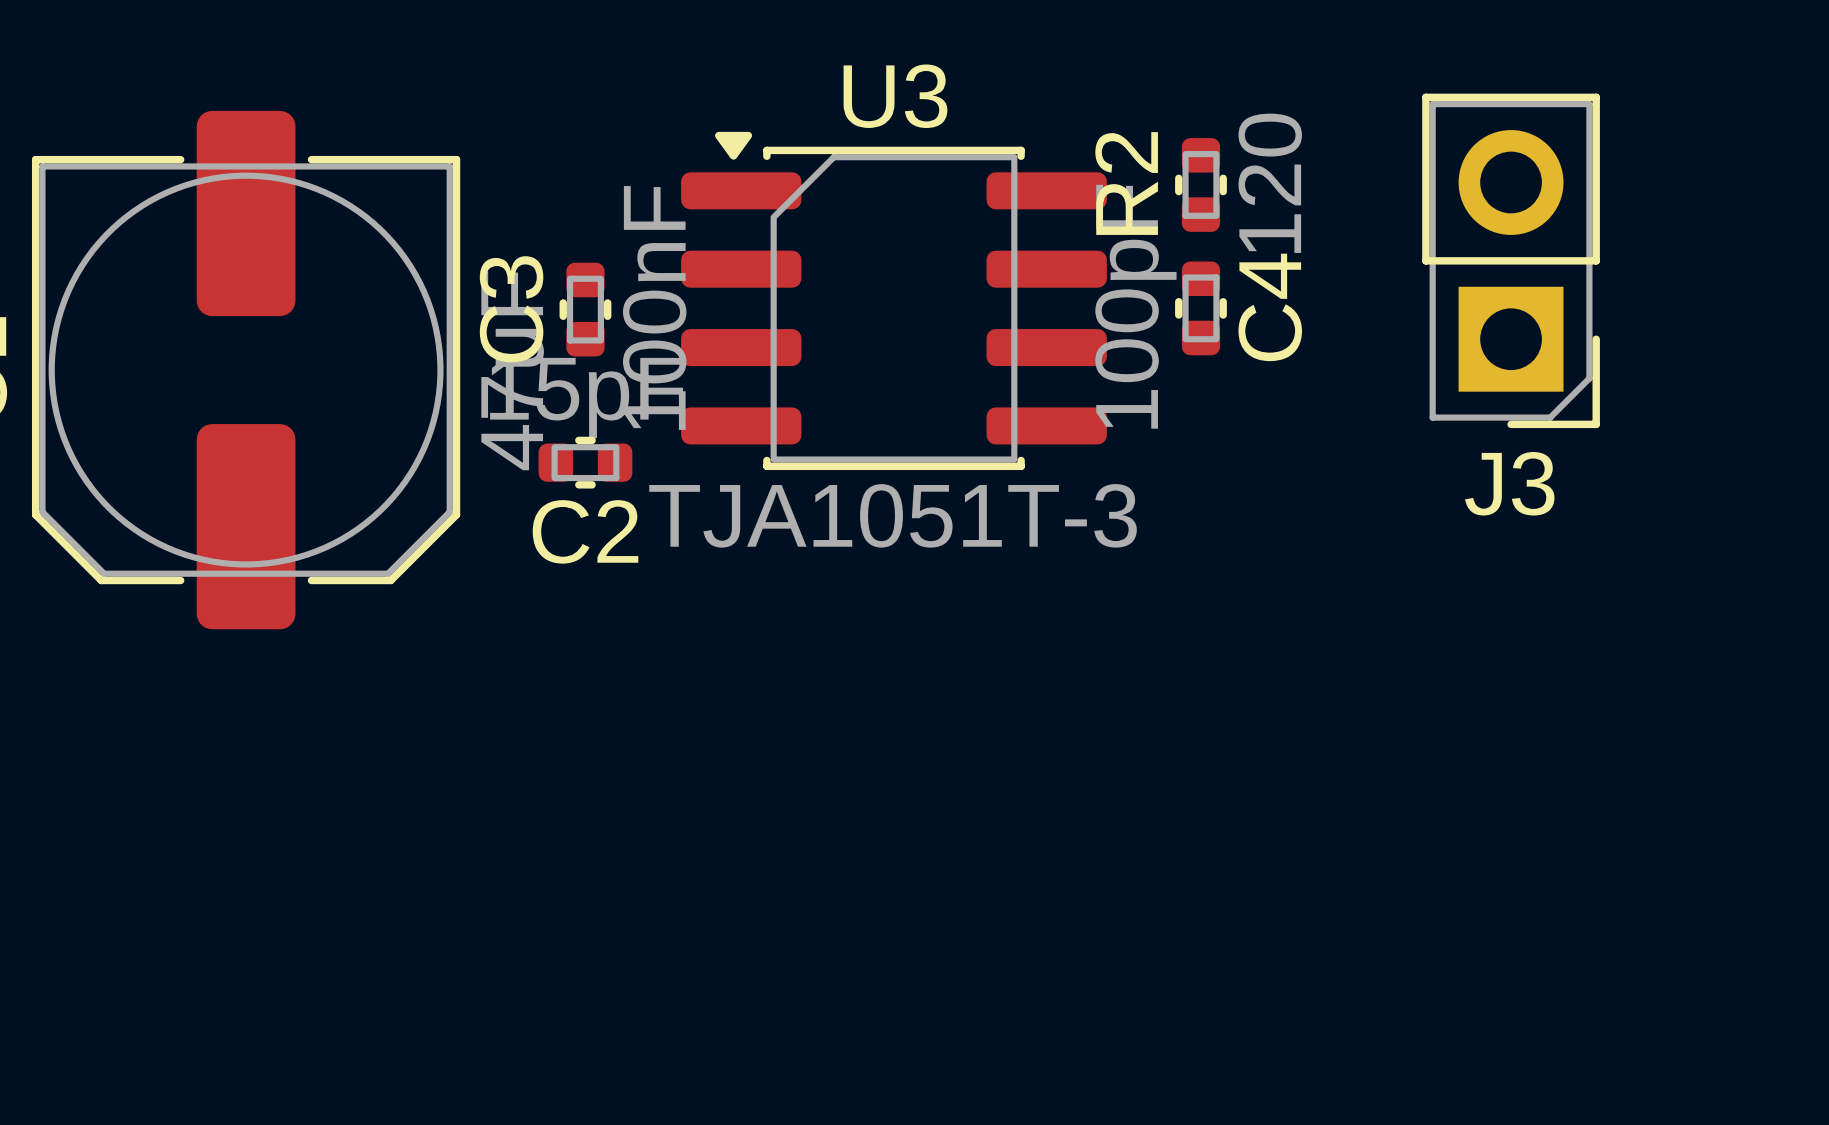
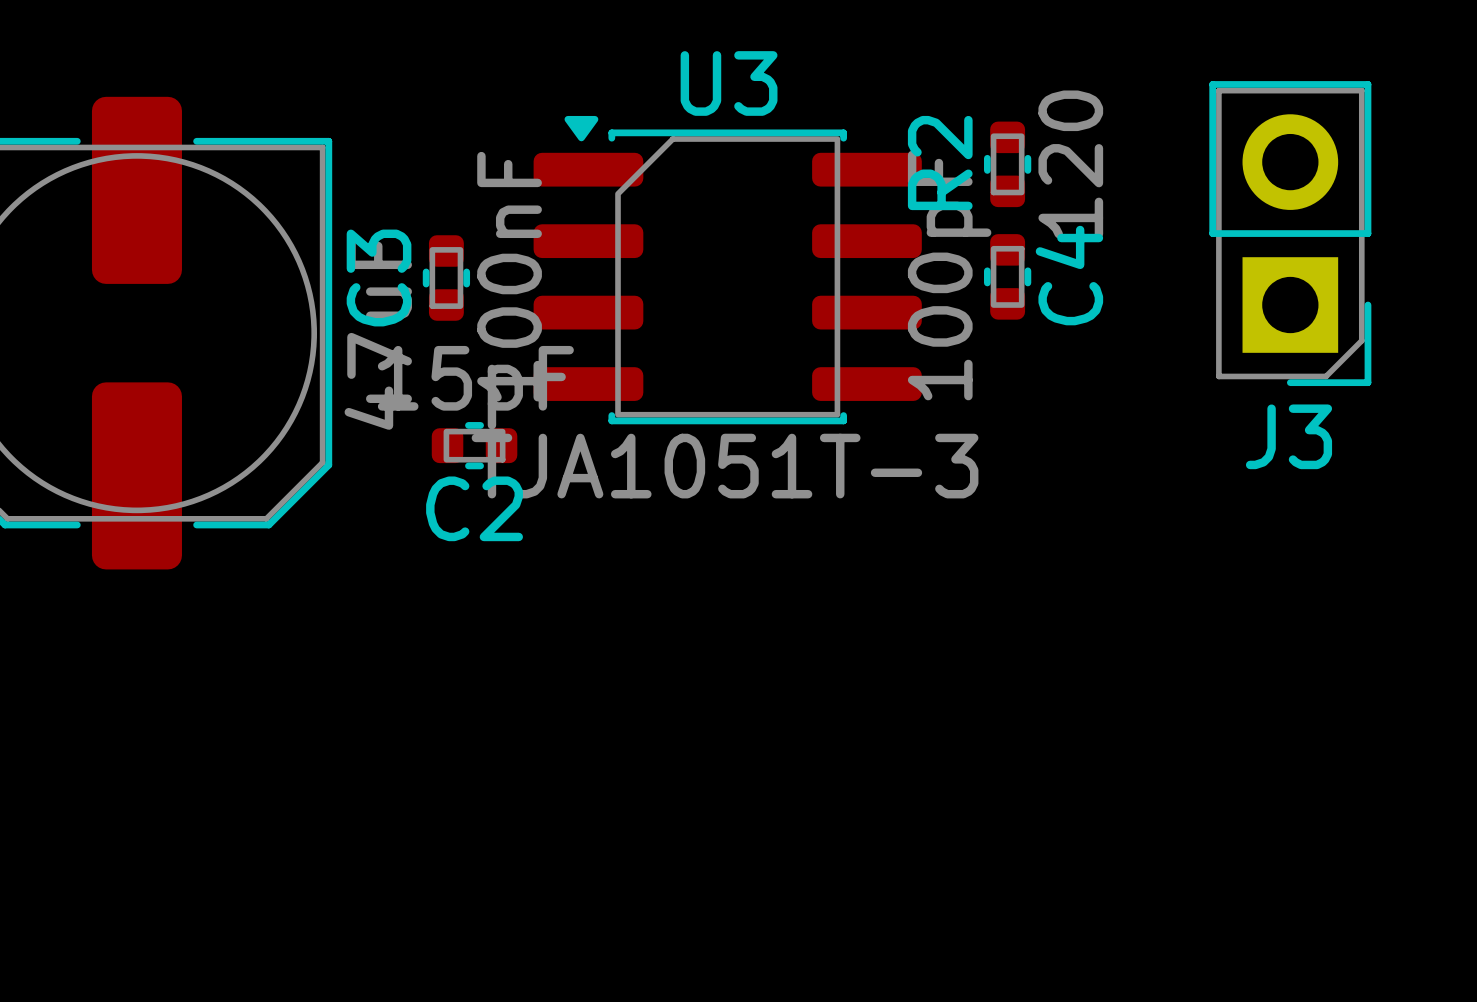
C2 position: (585, 462) -> (474, 445)

